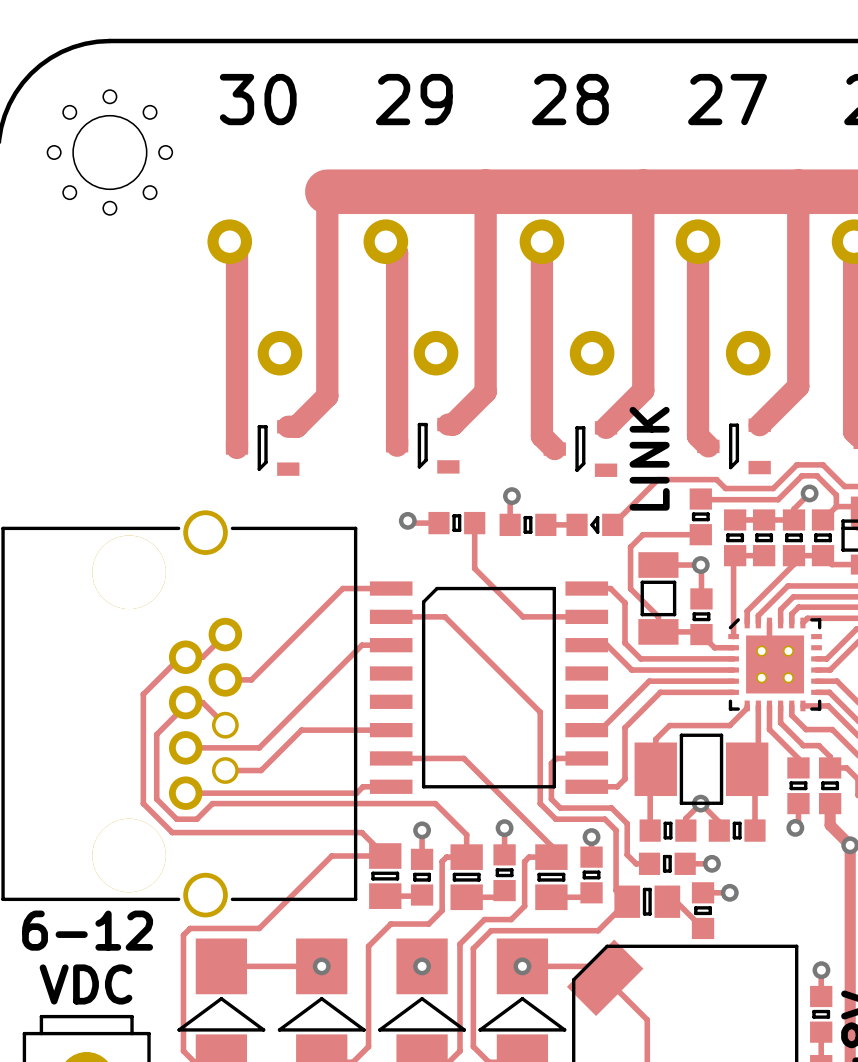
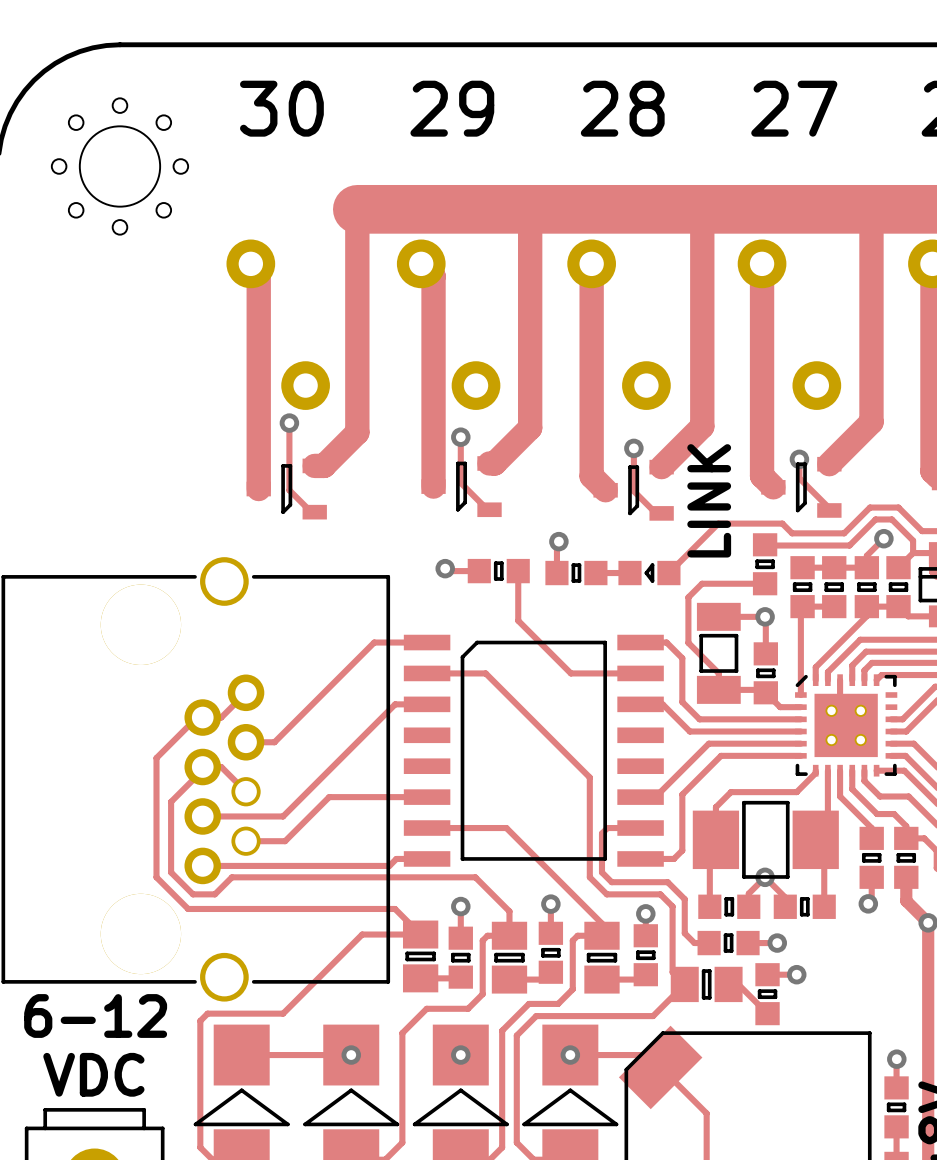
track: none -> (289, 423) (289, 490) (311, 512) (314, 512)
via: none -> (289, 423)
track: none -> (460, 437) (460, 482) (489, 509)
via: none -> (460, 437)
track: none -> (633, 448) (633, 491) (656, 513) (661, 513)
via: none -> (633, 448)
track: none -> (799, 459) (799, 478) (829, 510)
via: none -> (799, 459)

